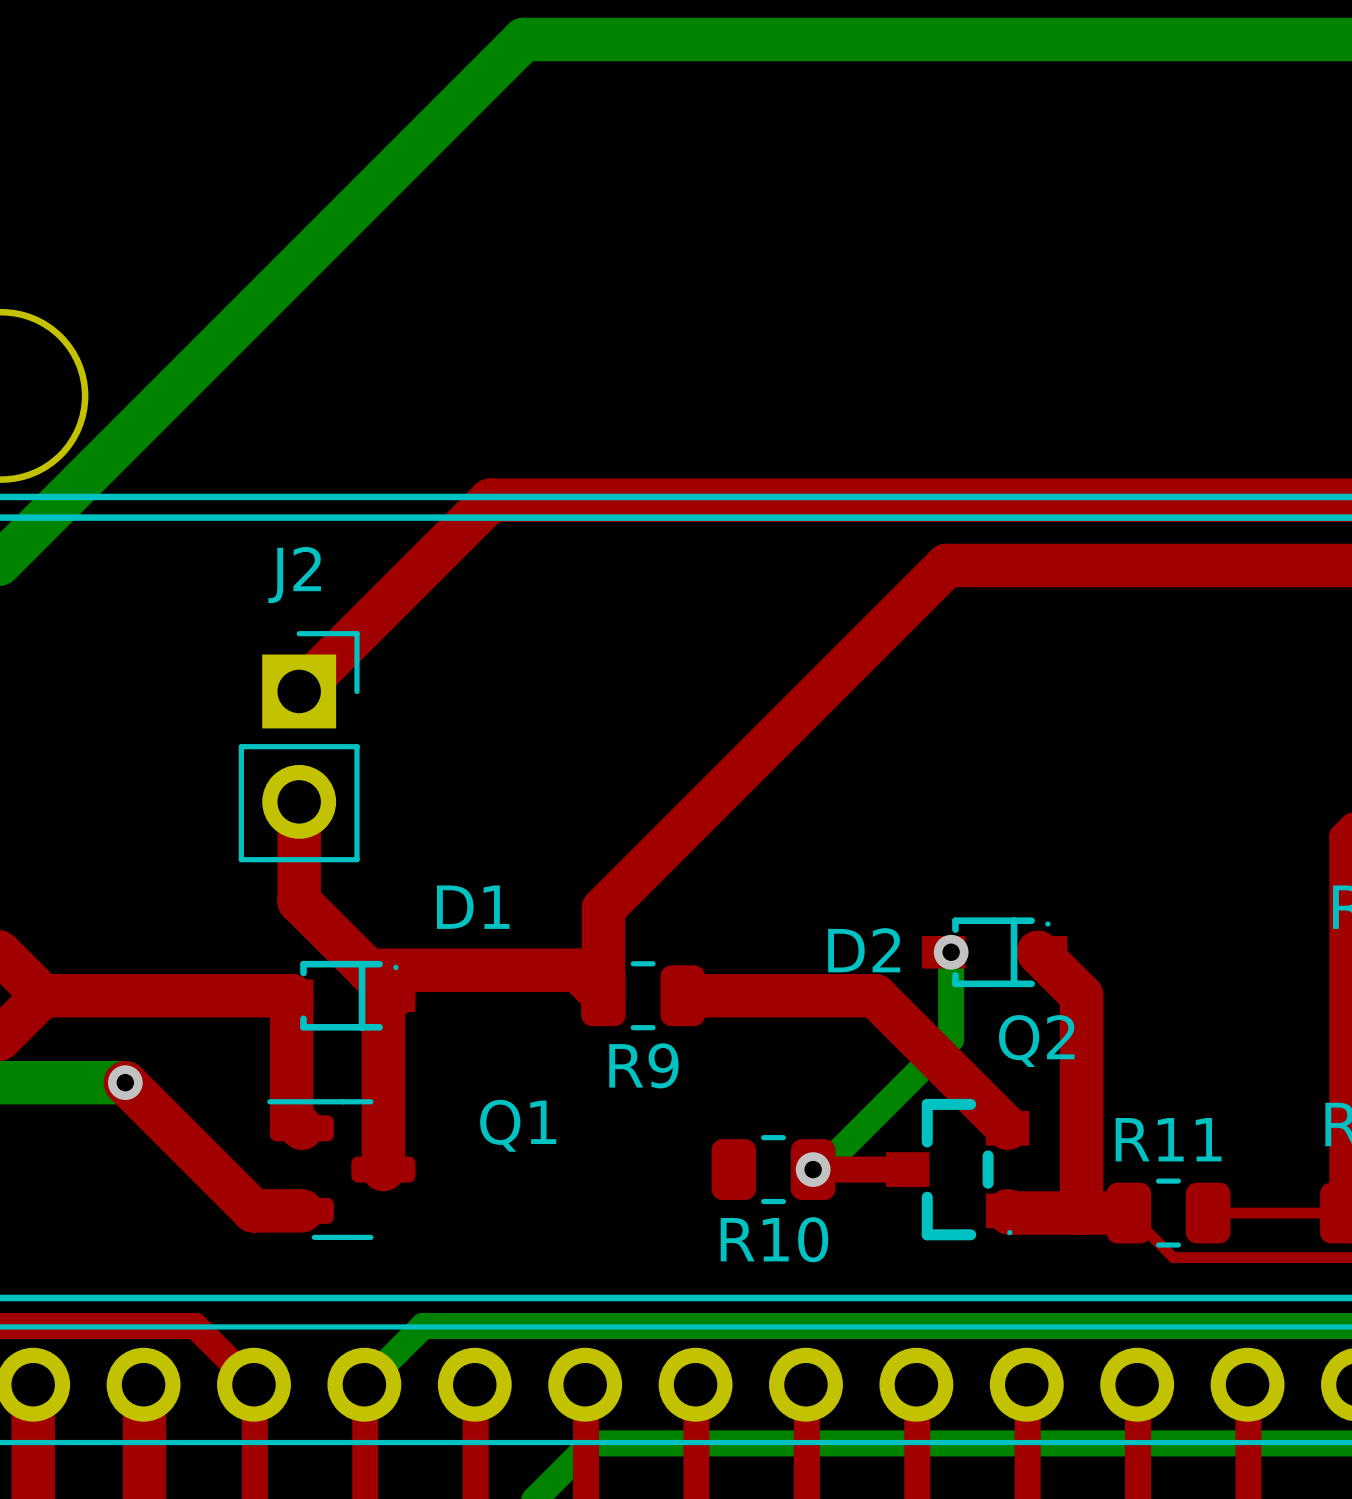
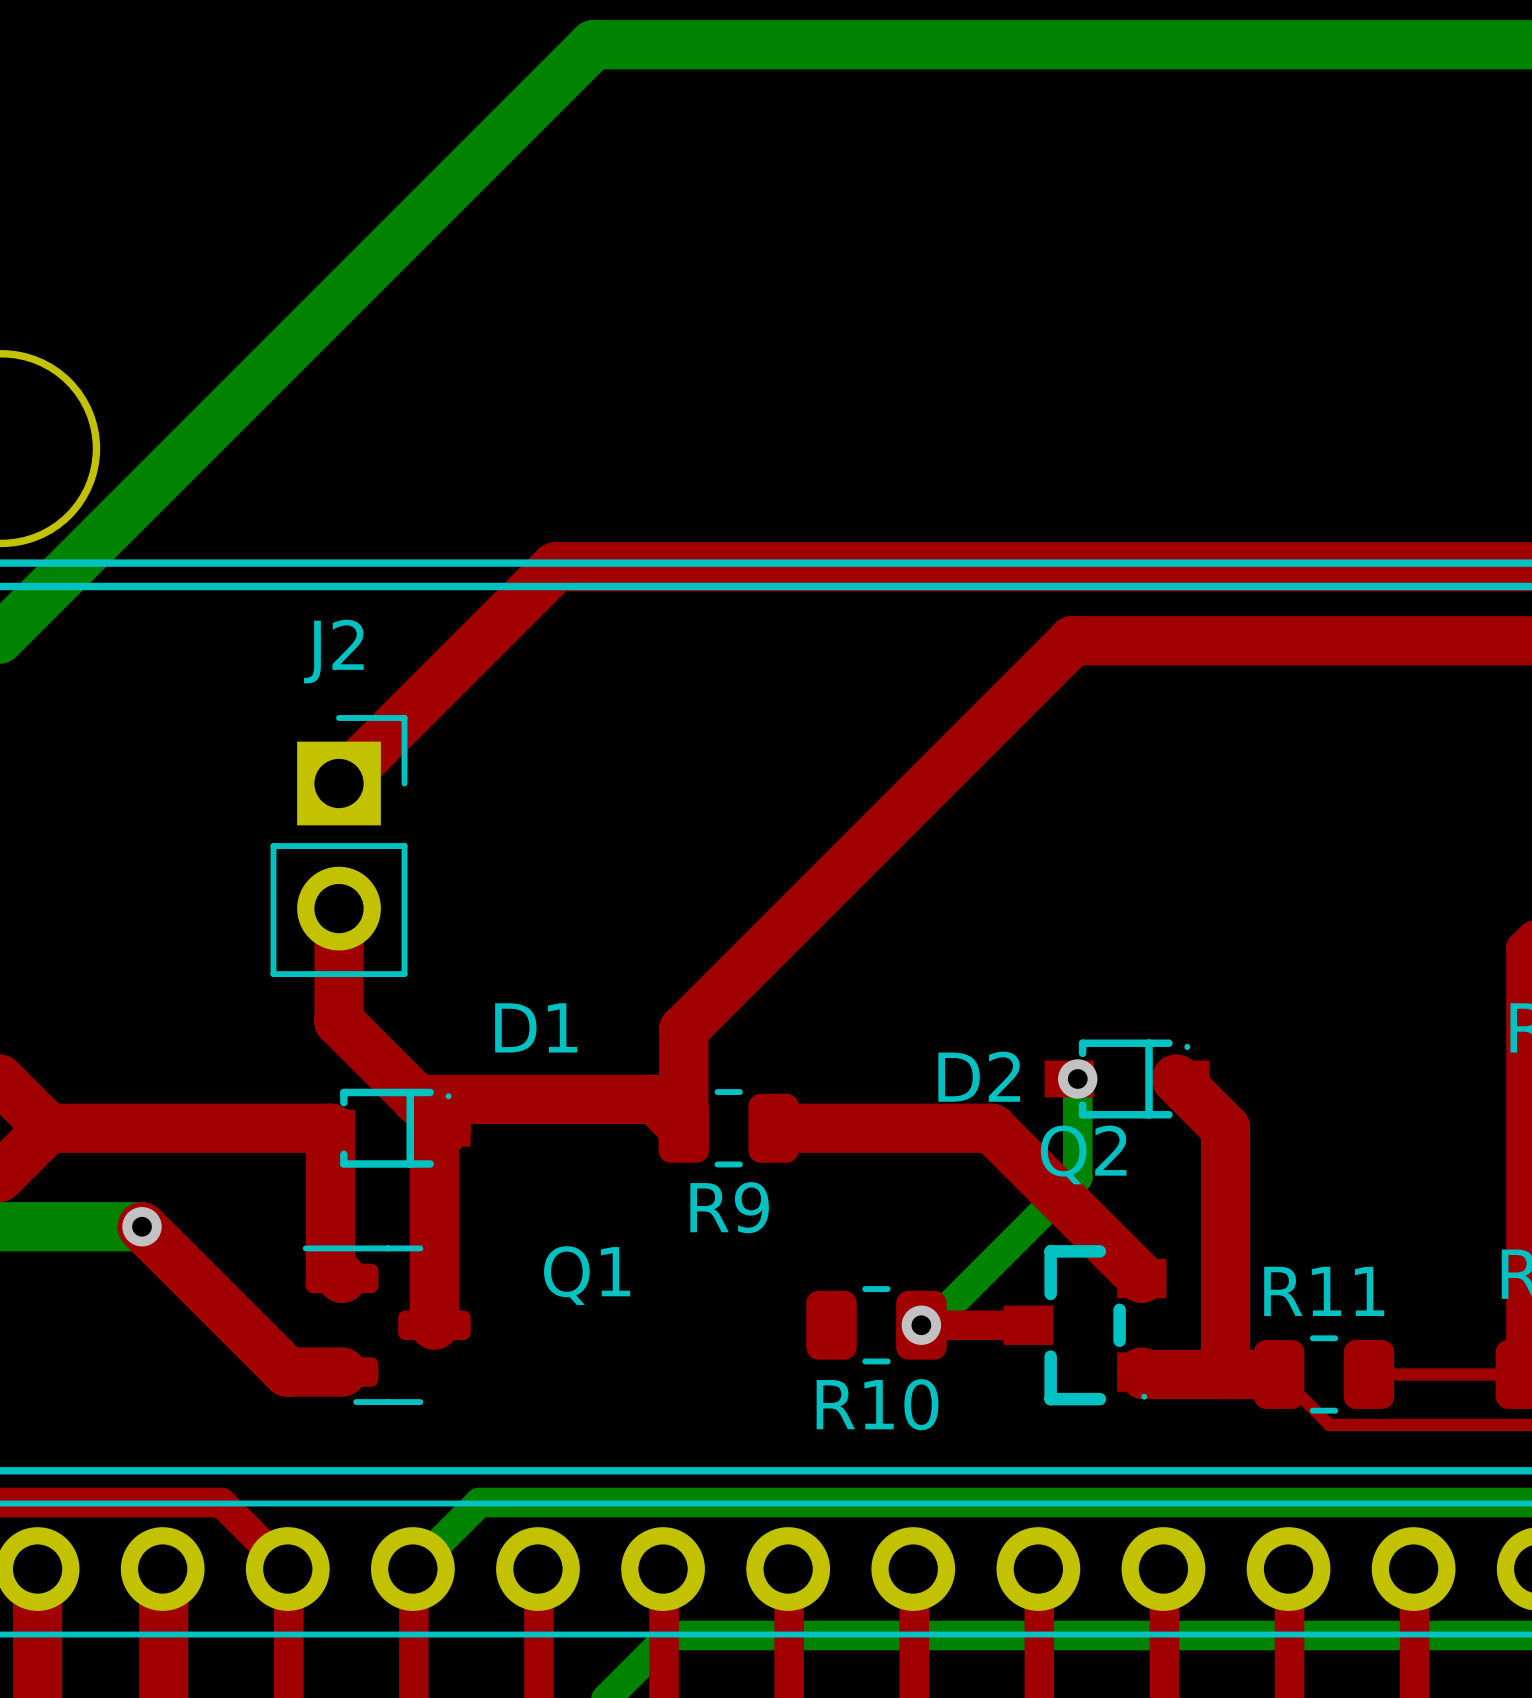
Q2 name position: Q2 (1036, 1041) -> Q2 (1083, 1154)

